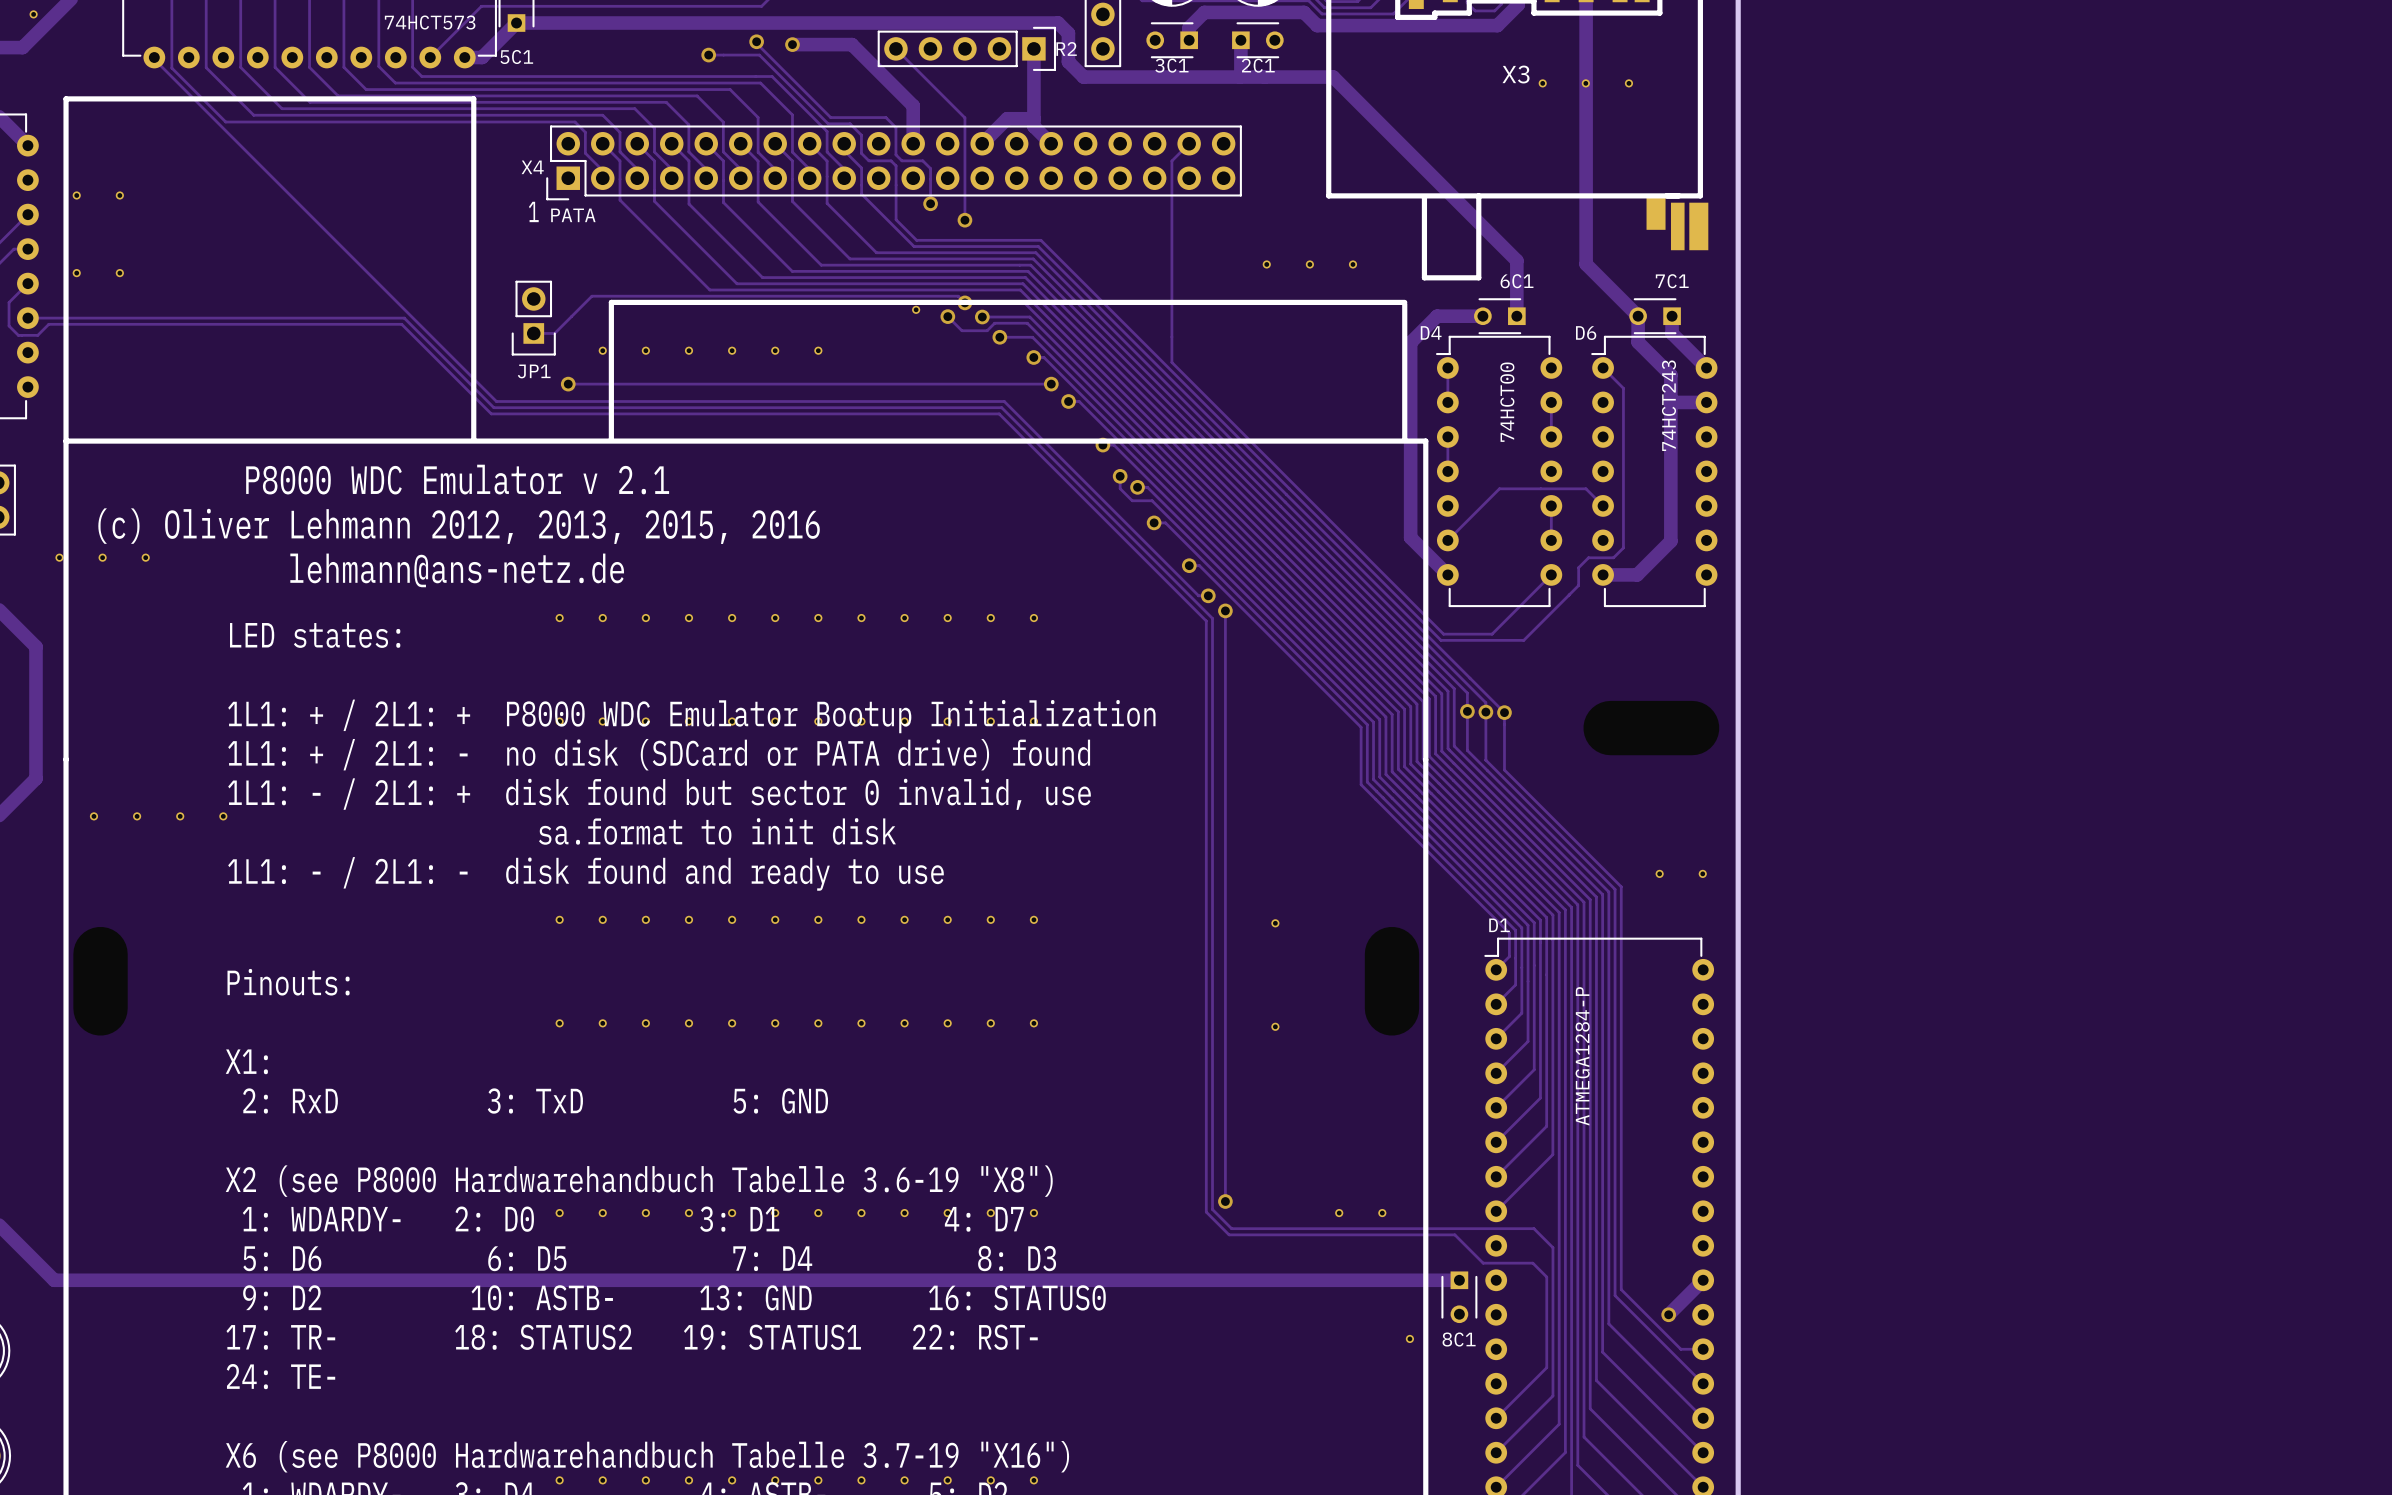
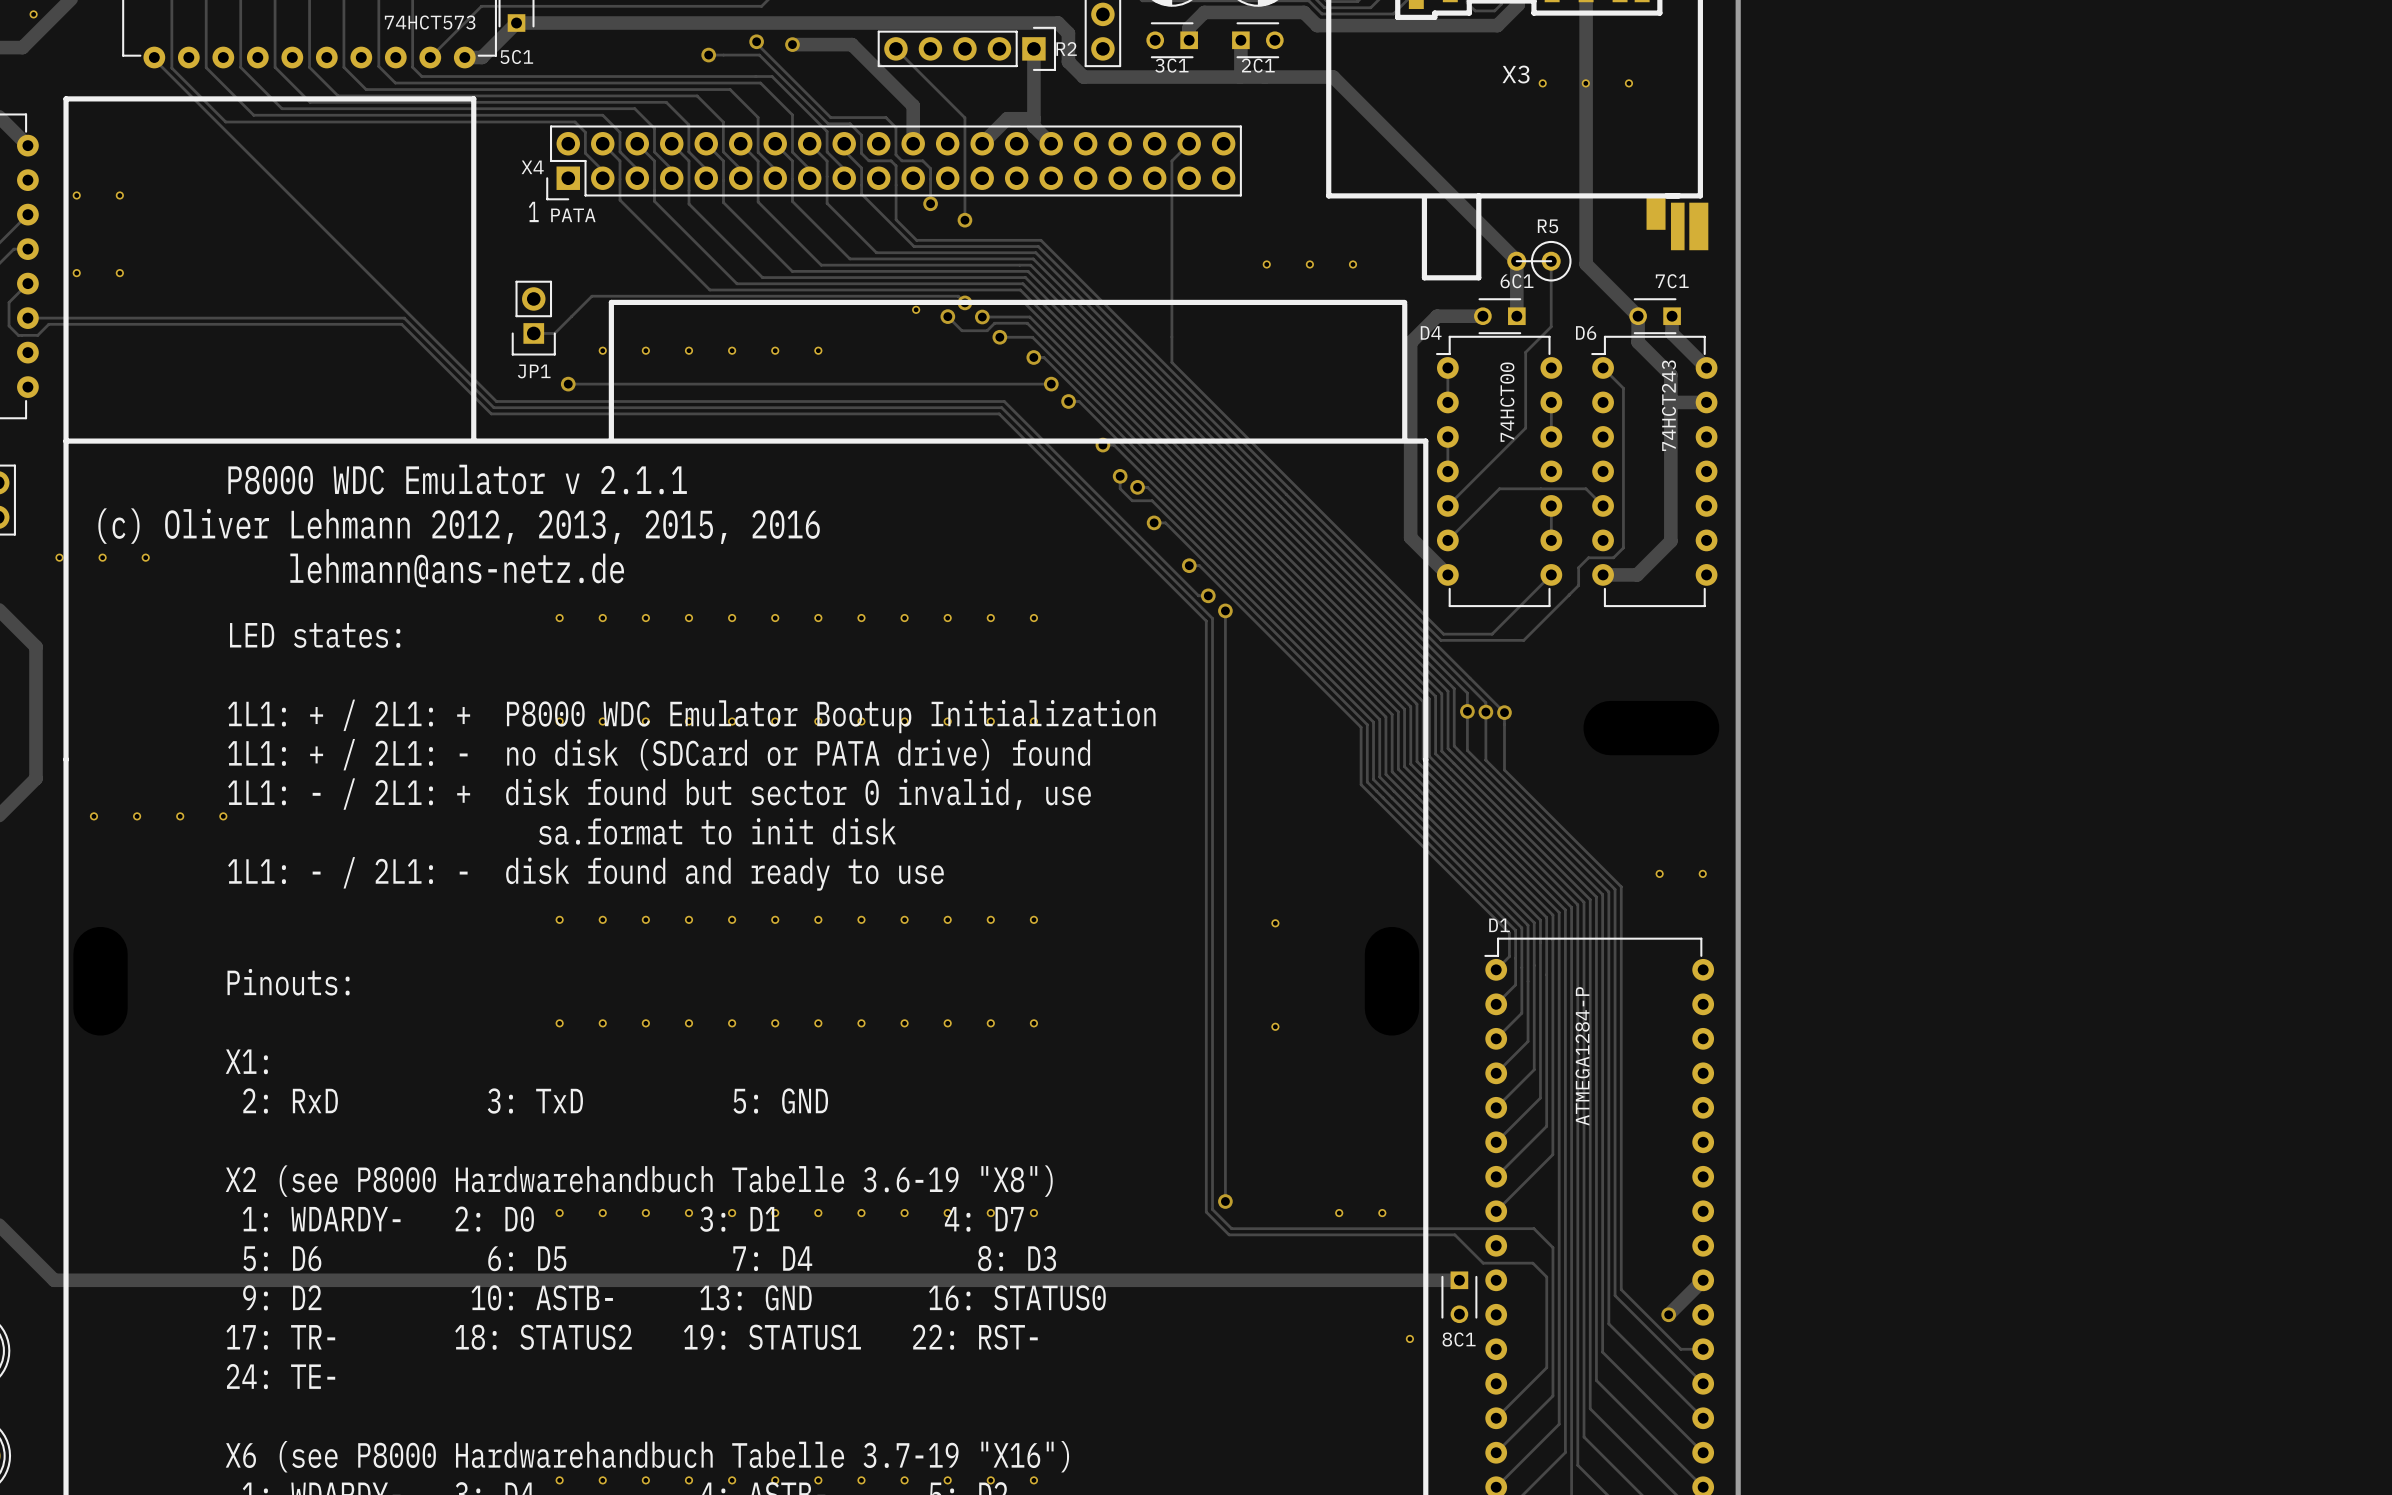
R5: none -> (1539, 261)
track: none -> (1551, 261) (1551, 326) (1525, 352) (1525, 428) (1447, 505)
text: P8000 WDC Emulator v 2.1 (457, 479) -> P8000 WDC Emulator v 2.1.1 (457, 479)

